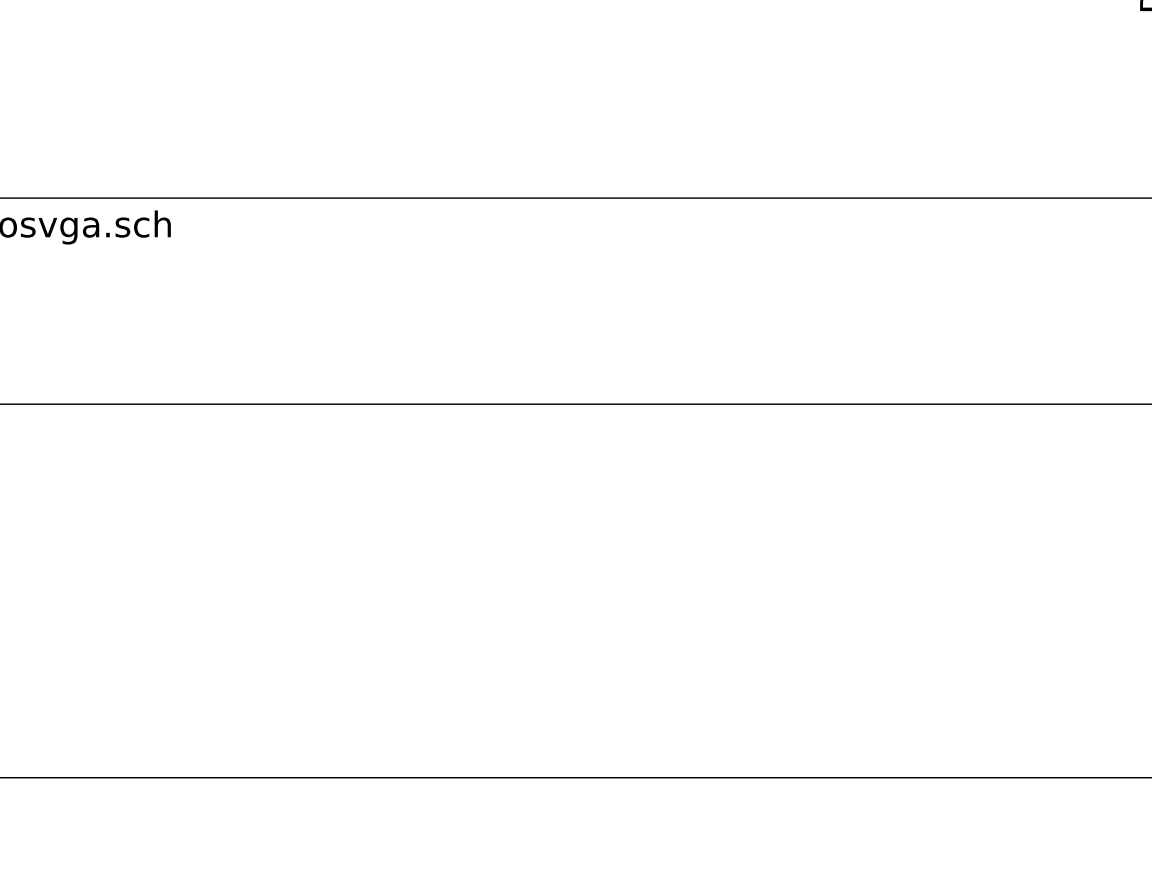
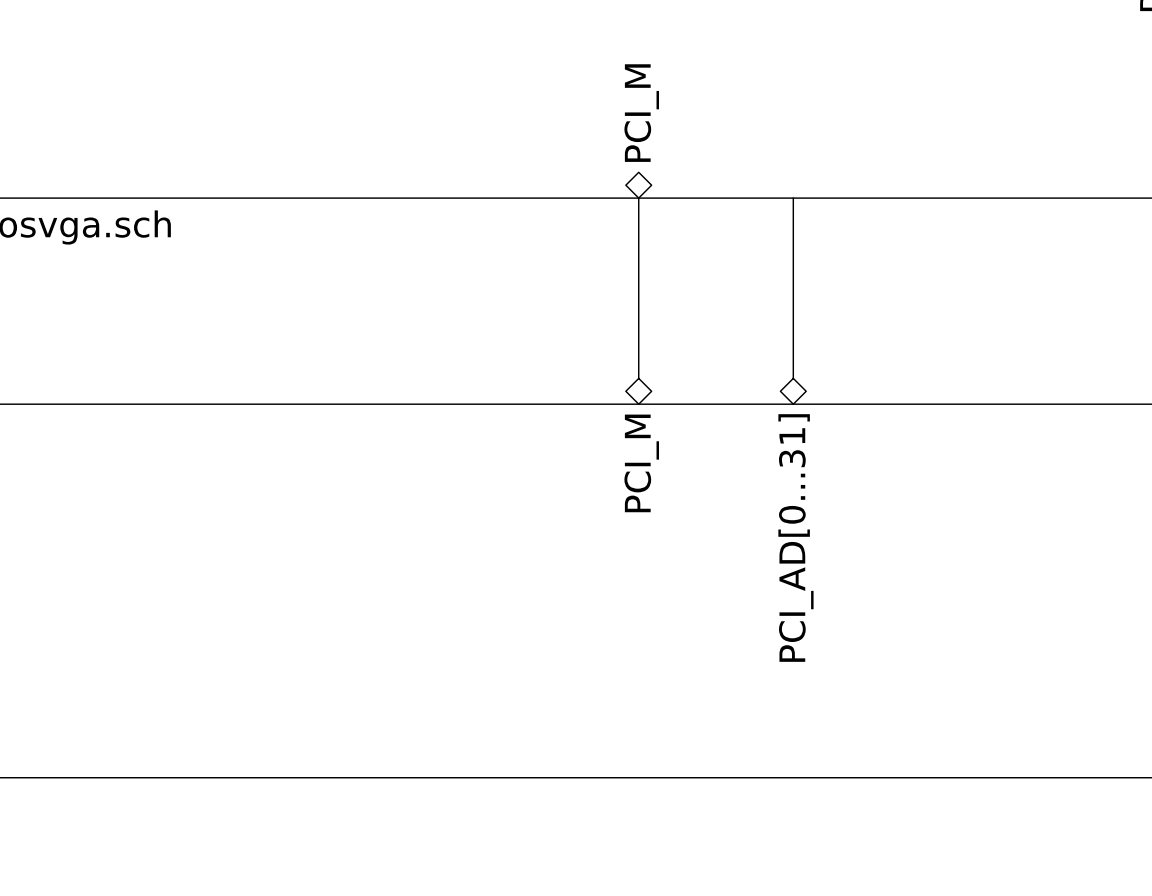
sheet pin: none -> PCI_M (641, 113)
bus: none -> (638, 198) (638, 378)
bus: none -> (793, 198) (793, 378)
sheet pin: none -> PCI_M (641, 463)
sheet pin: none -> PCI_AD[0...31] (795, 538)

